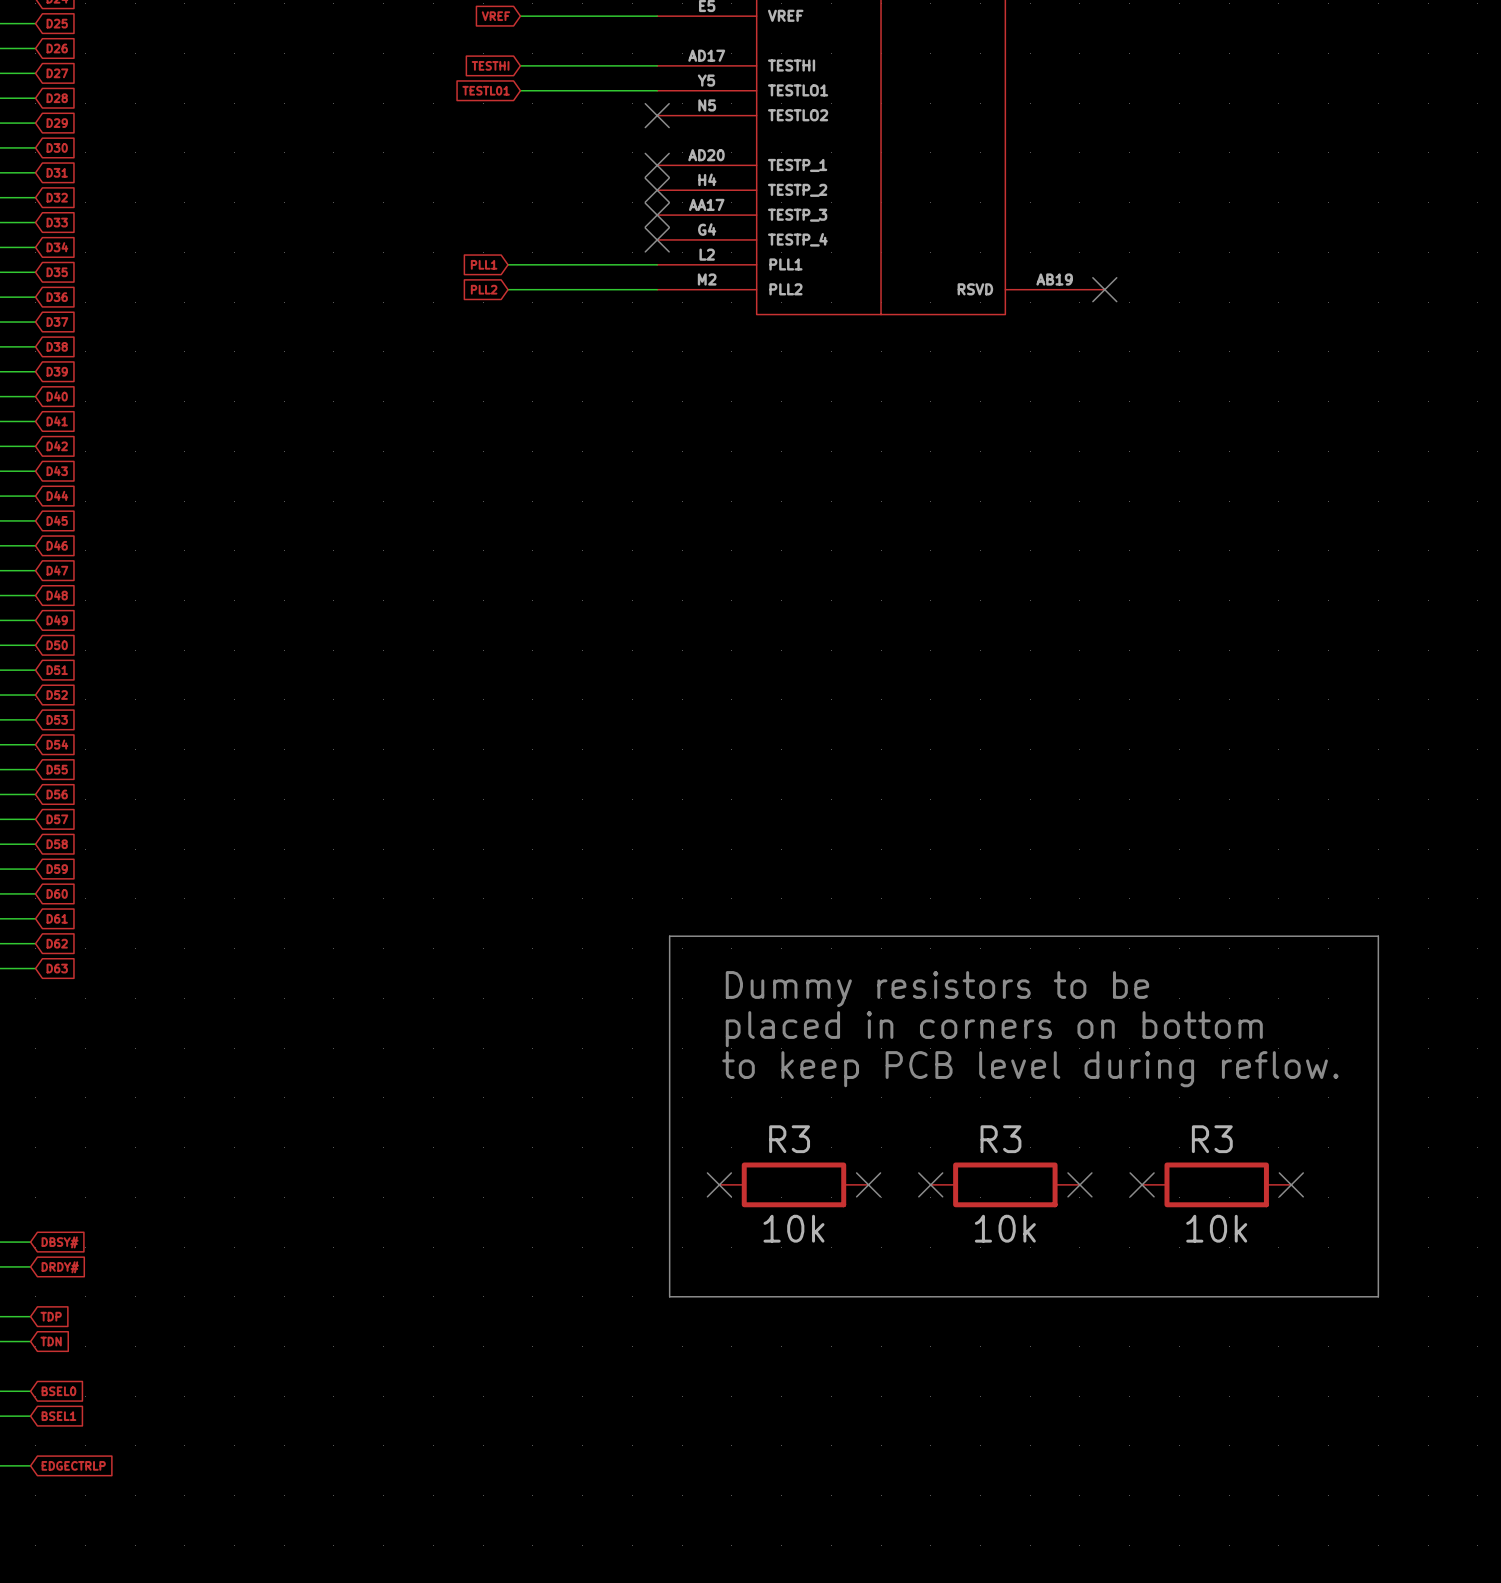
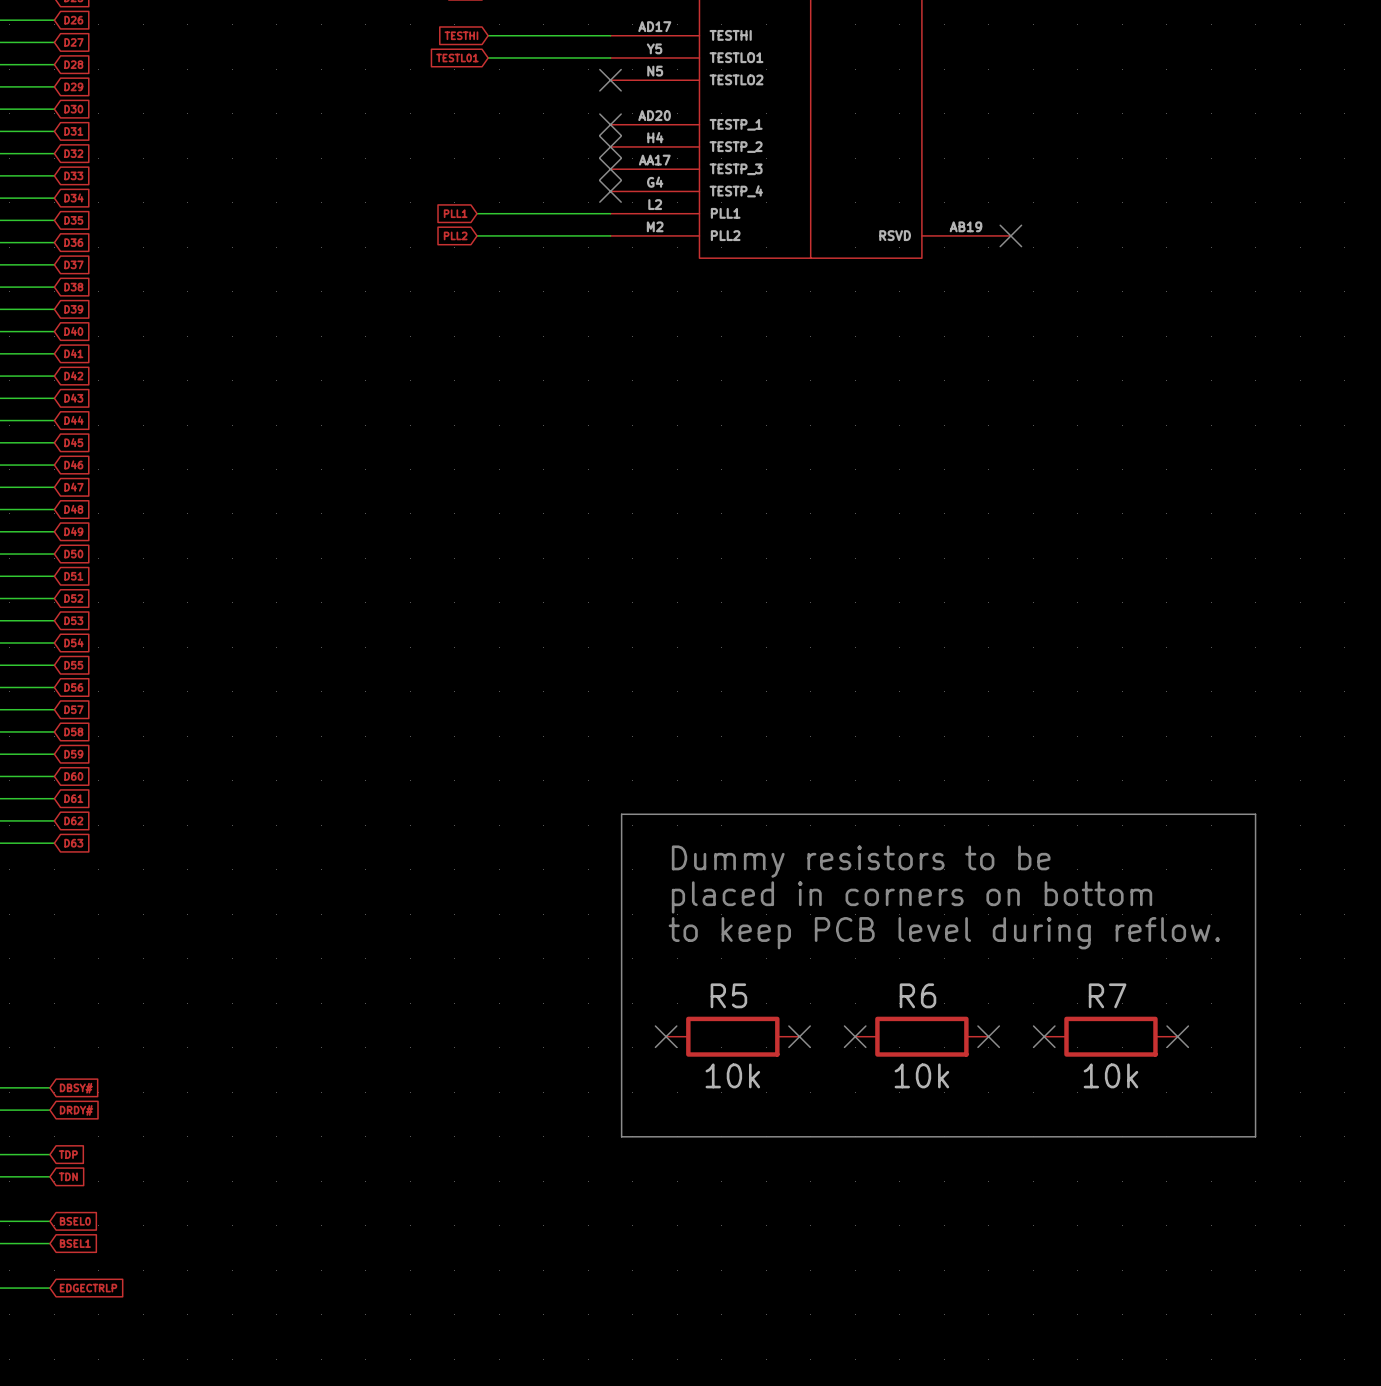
R3 name: R3 (789, 1139) -> R5 (728, 995)
R3 name: R3 (1000, 1139) -> R6 (917, 995)
R3 name: R3 (1212, 1139) -> R7 (1107, 995)

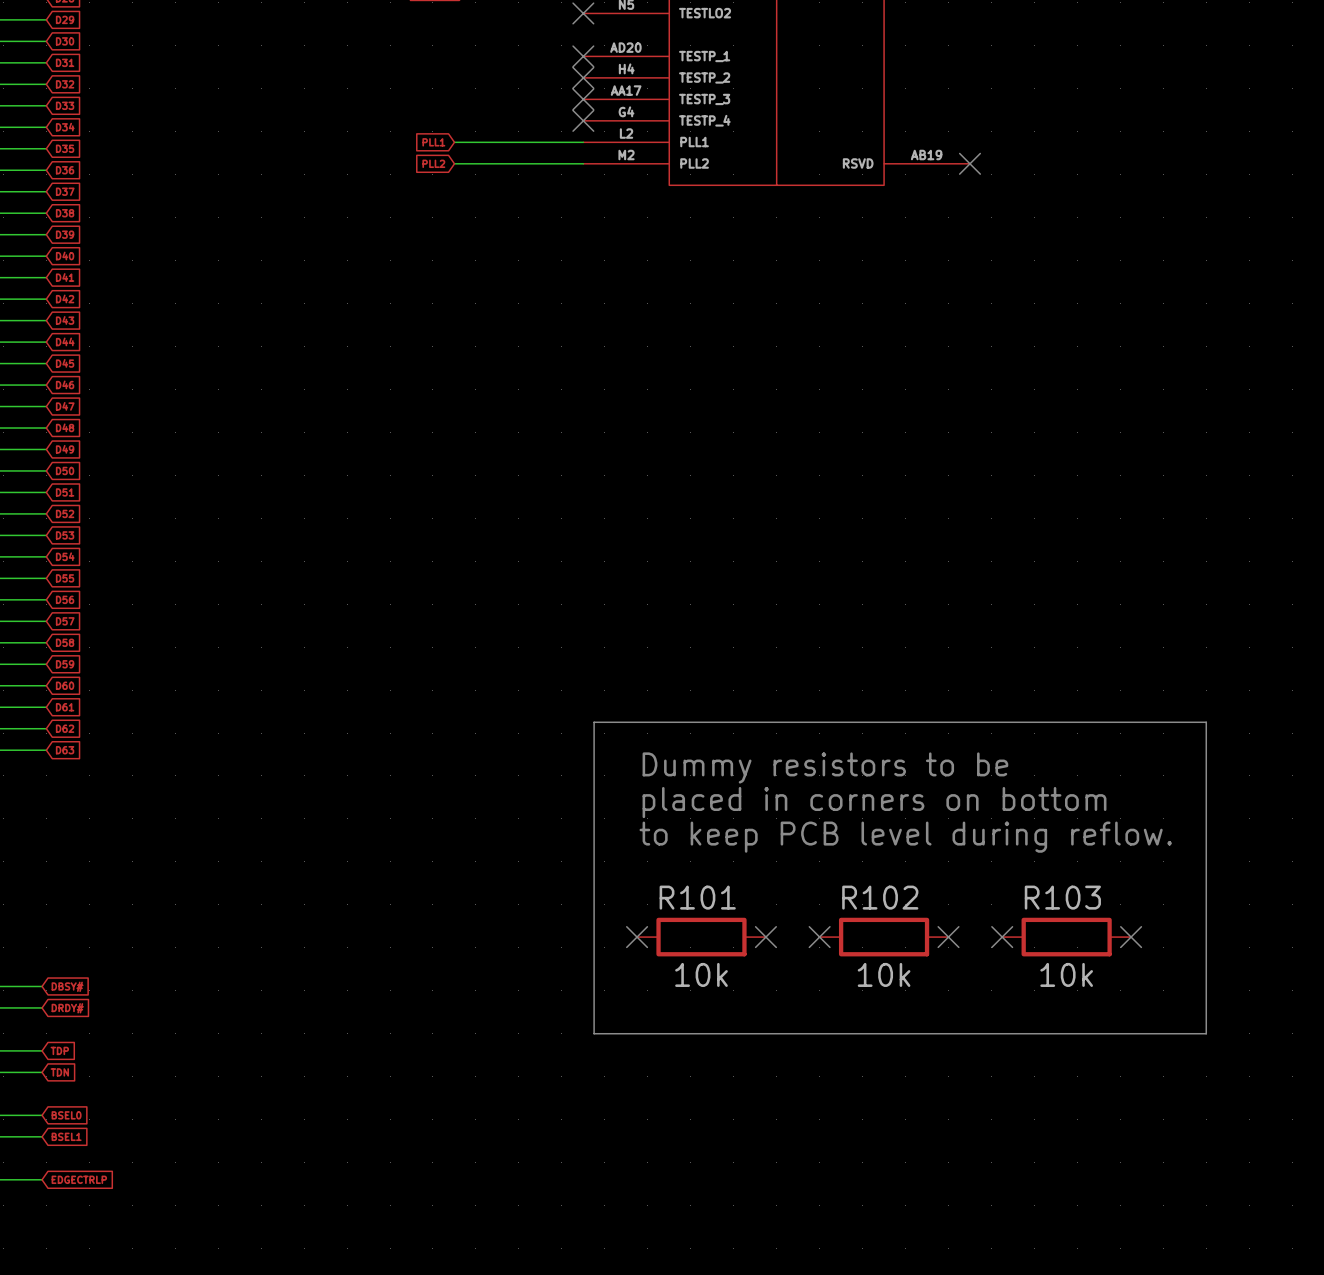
R5 name: R5 (728, 995) -> R101 (697, 897)
R6 name: R6 (917, 995) -> R102 (880, 897)
R7 name: R7 (1107, 995) -> R103 (1062, 897)

